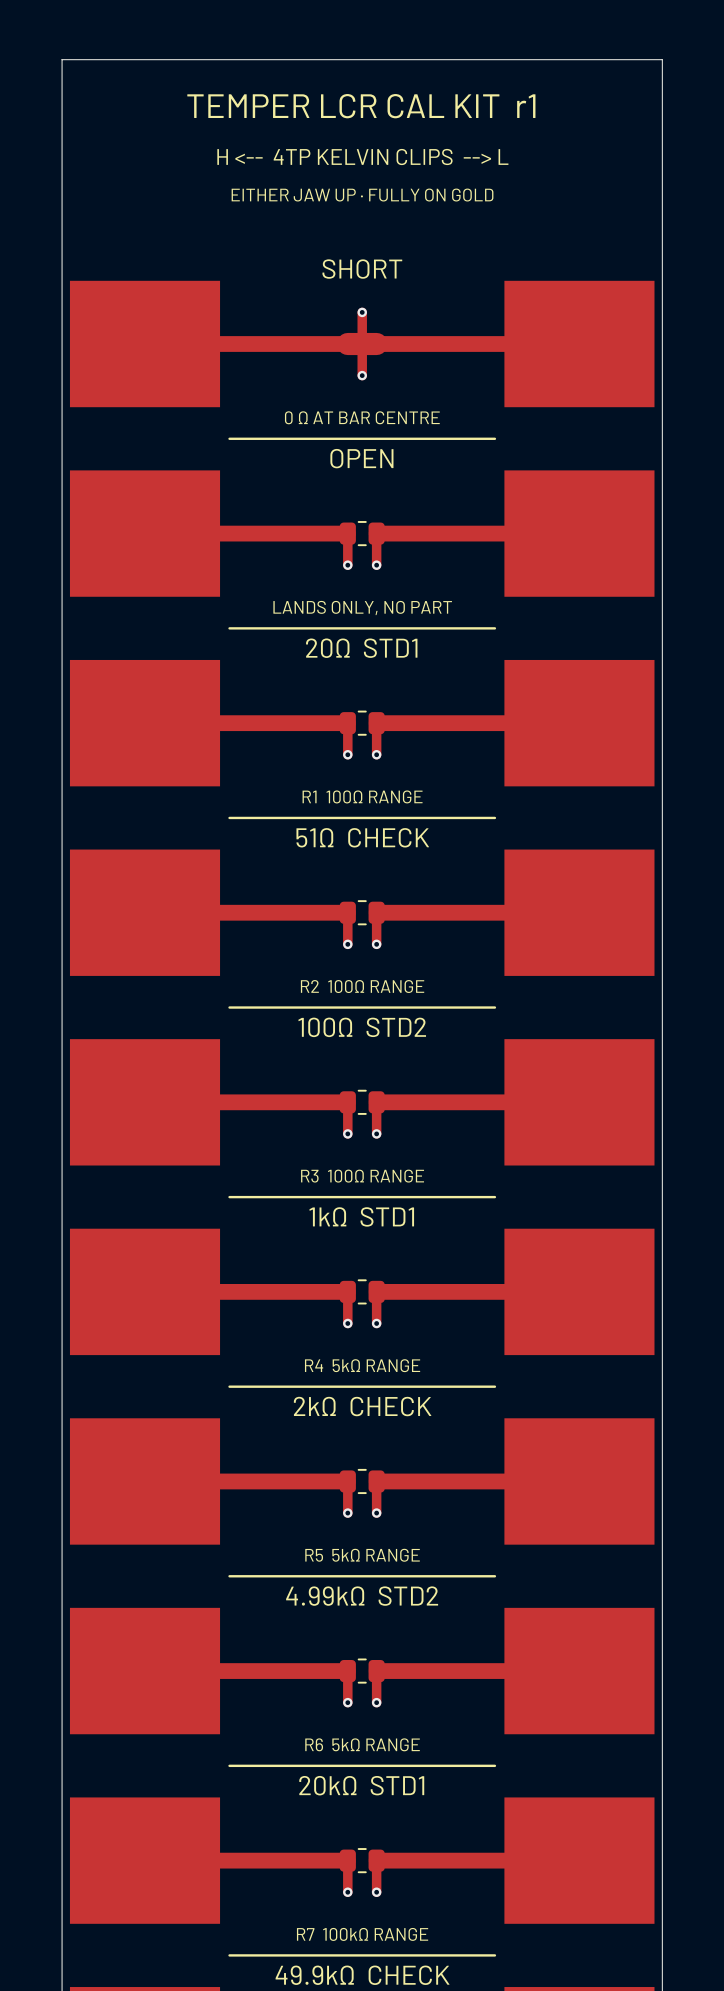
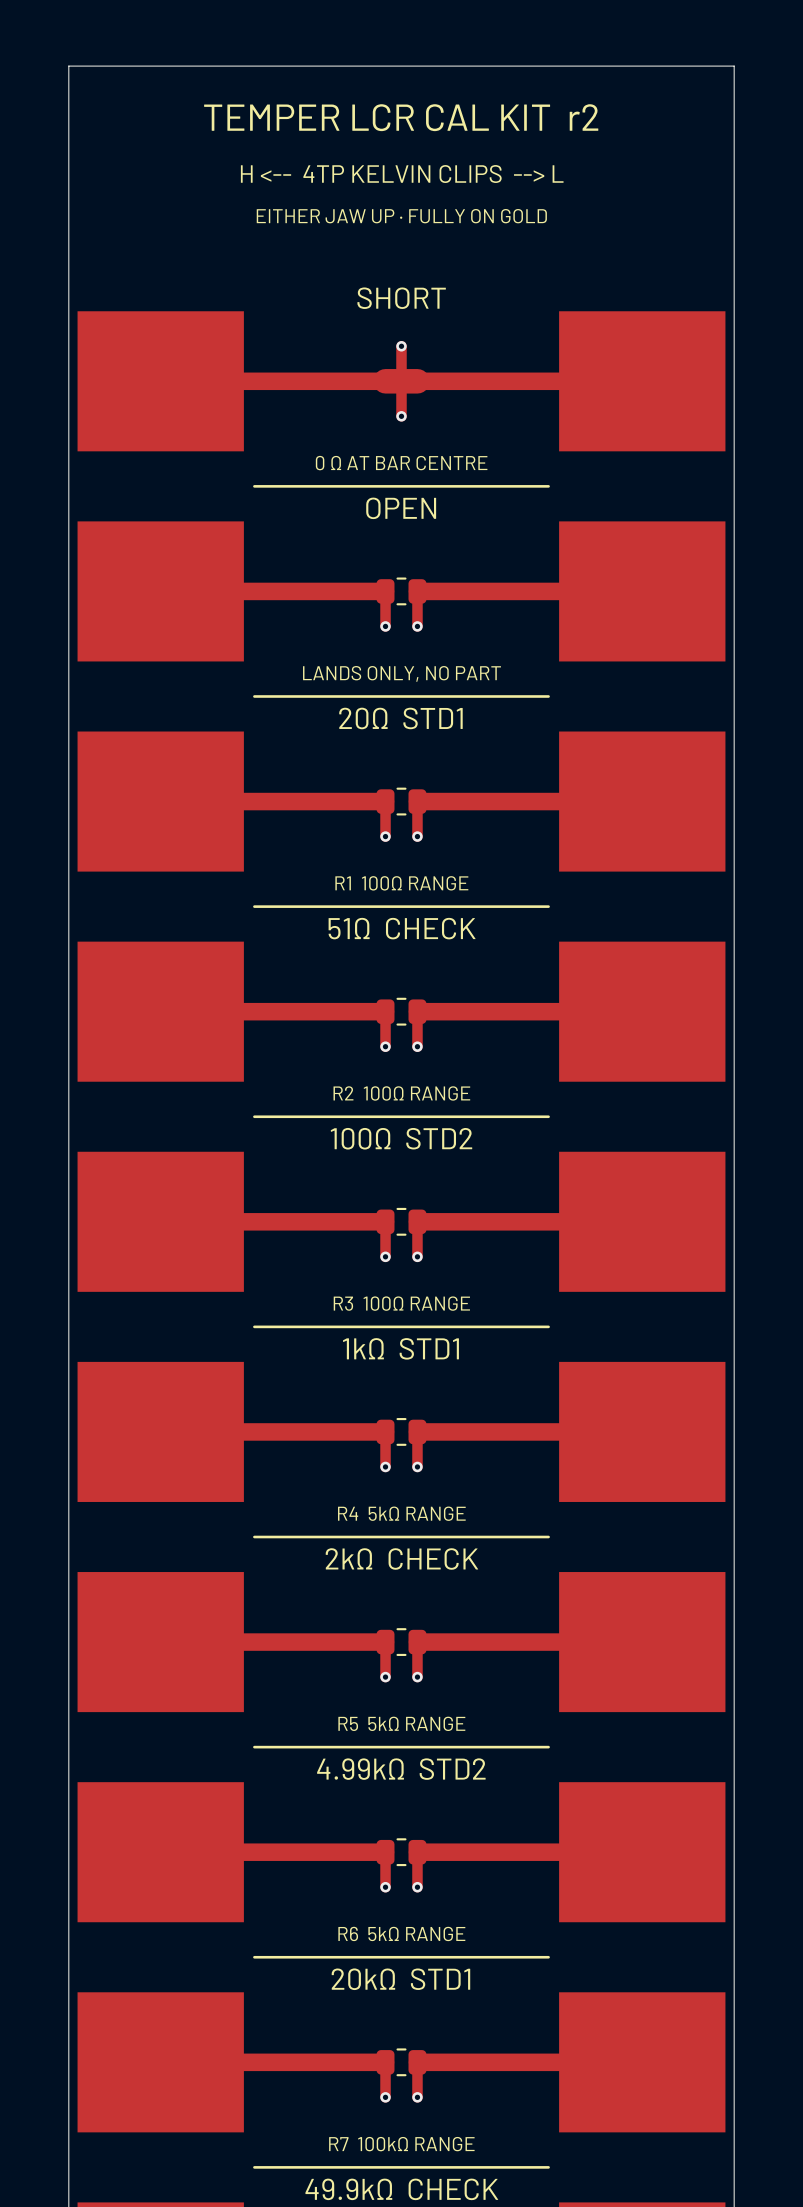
text: TEMPER LCR CAL KIT r1 (361, 106) -> TEMPER LCR CAL KIT r2 (401, 117)

